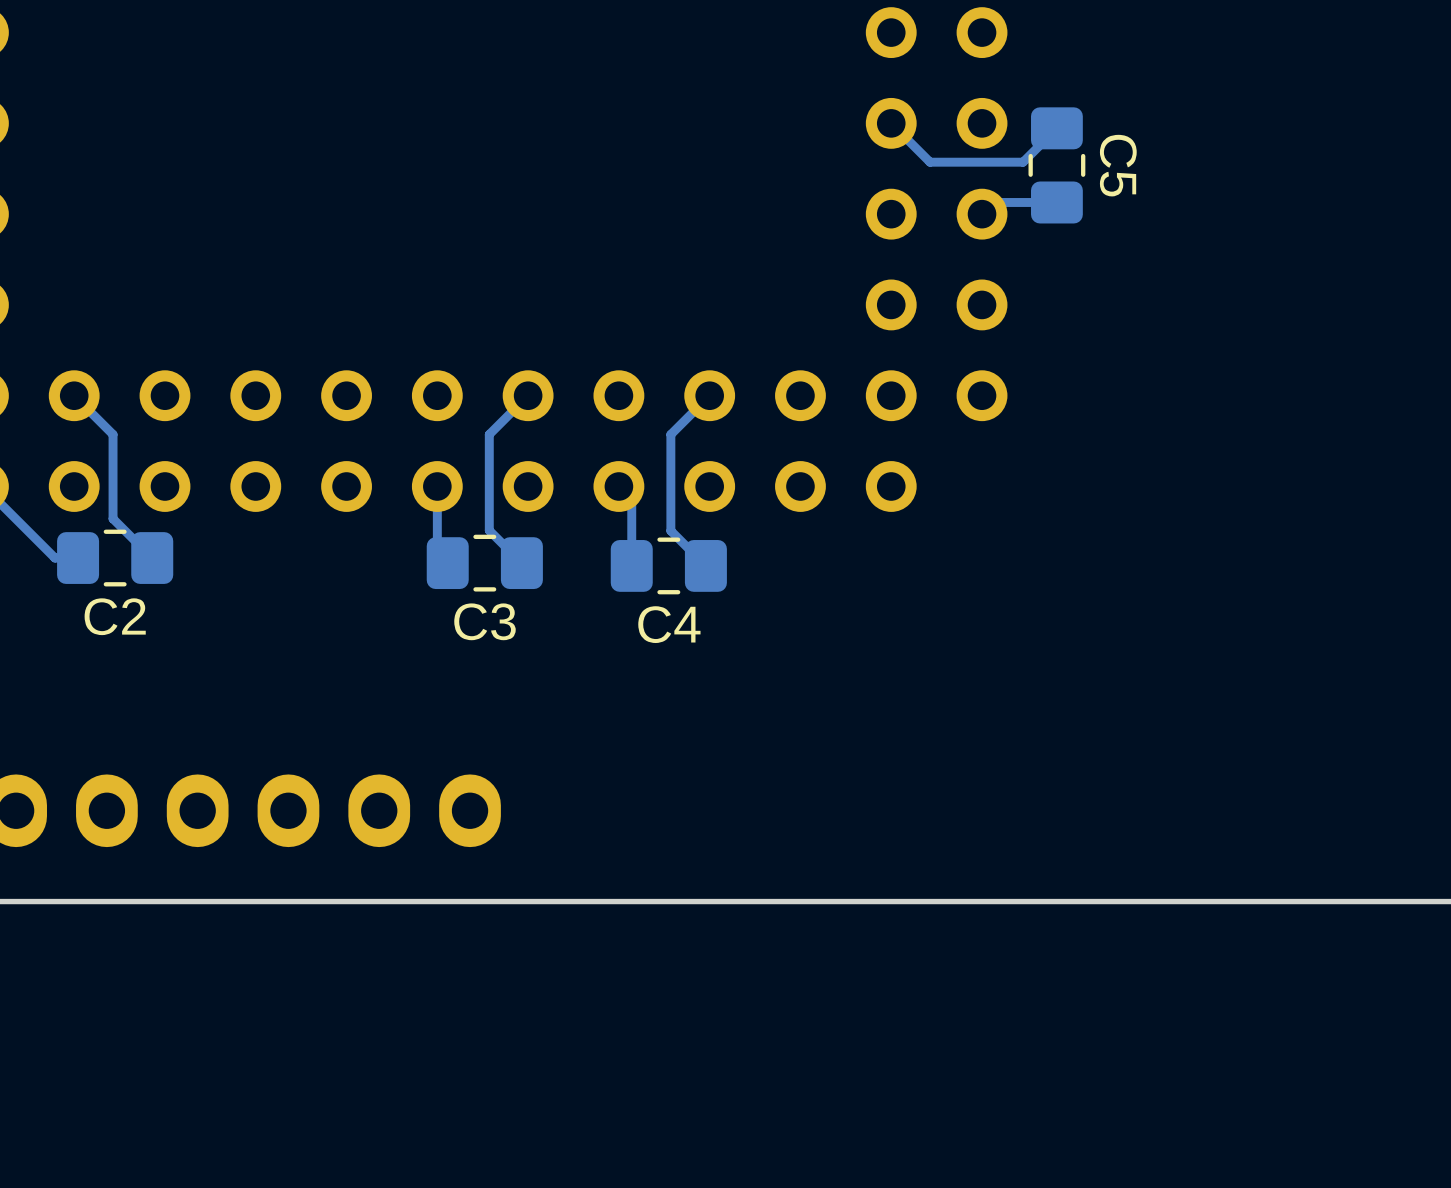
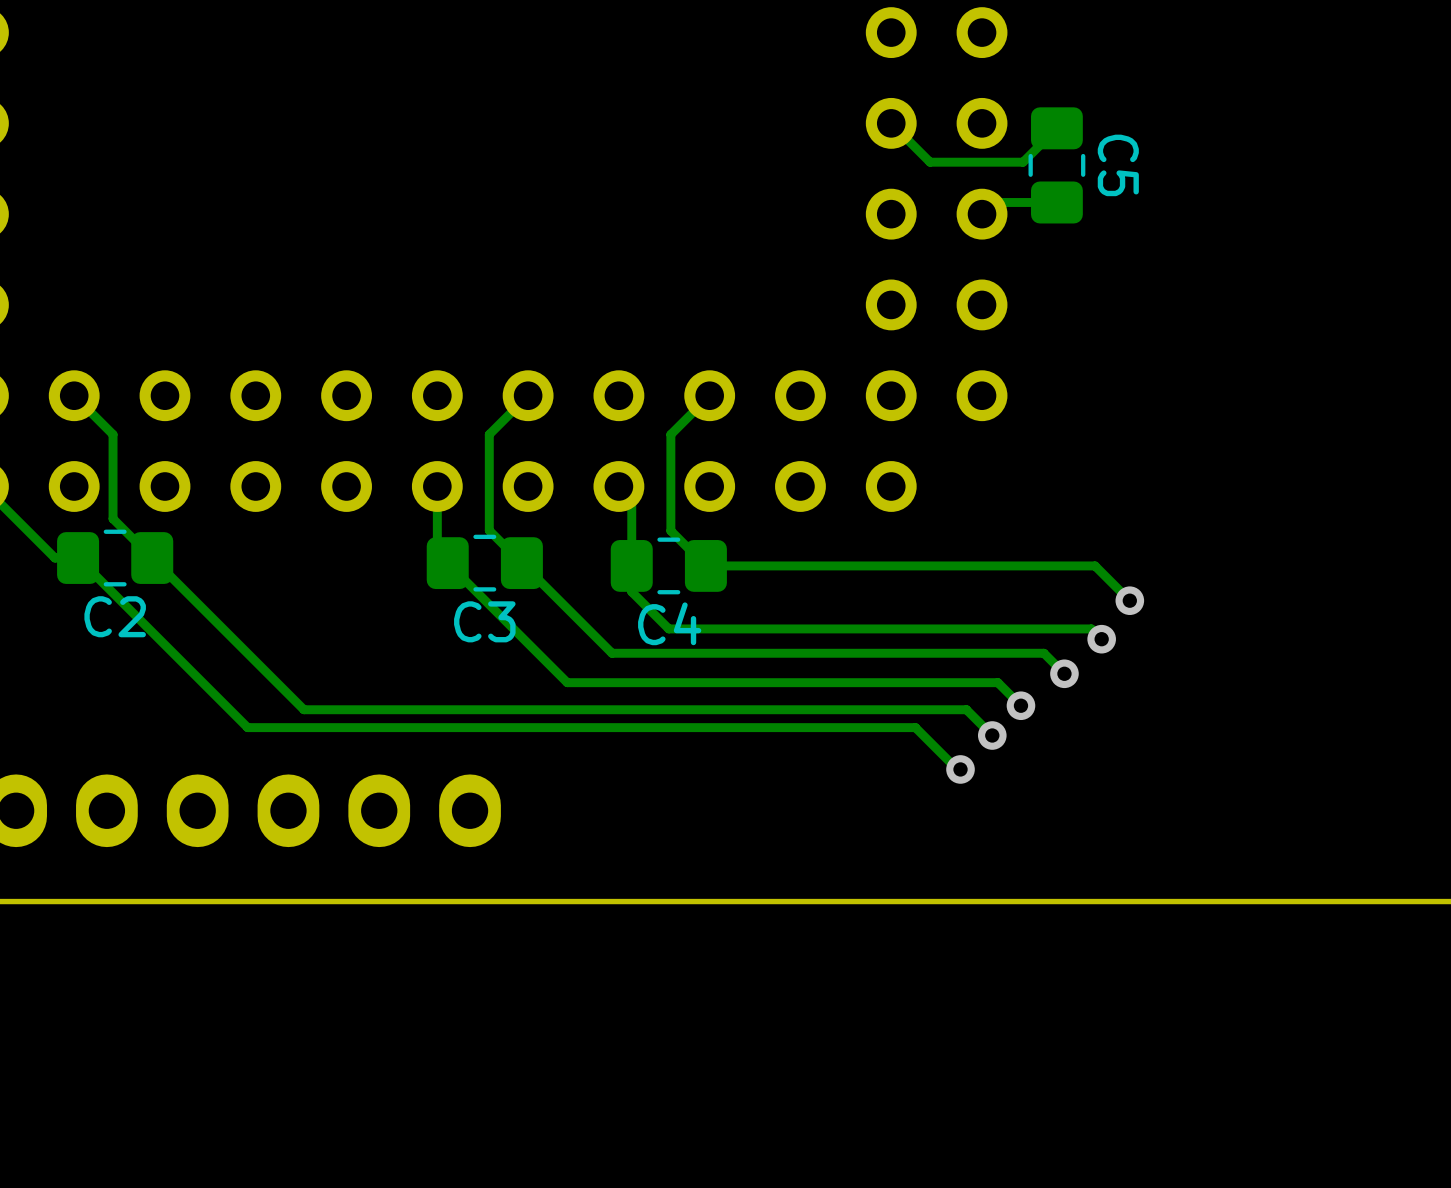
track: none -> (78, 558) (247, 727) (915, 727) (957, 769) (960, 769)
track: none -> (152, 558) (303, 709) (966, 709) (992, 735)
track: none -> (447, 563) (567, 682) (997, 682) (1020, 705)
track: none -> (521, 563) (612, 653) (1043, 653) (1064, 673)
track: none -> (631, 565) (631, 591) (668, 628) (1091, 628) (1101, 639)
track: none -> (705, 565) (1095, 565) (1129, 600)
via: none -> (1129, 600)
via: none -> (1101, 639)
via: none -> (1064, 673)
via: none -> (1020, 705)
via: none -> (992, 735)
via: none -> (960, 769)

